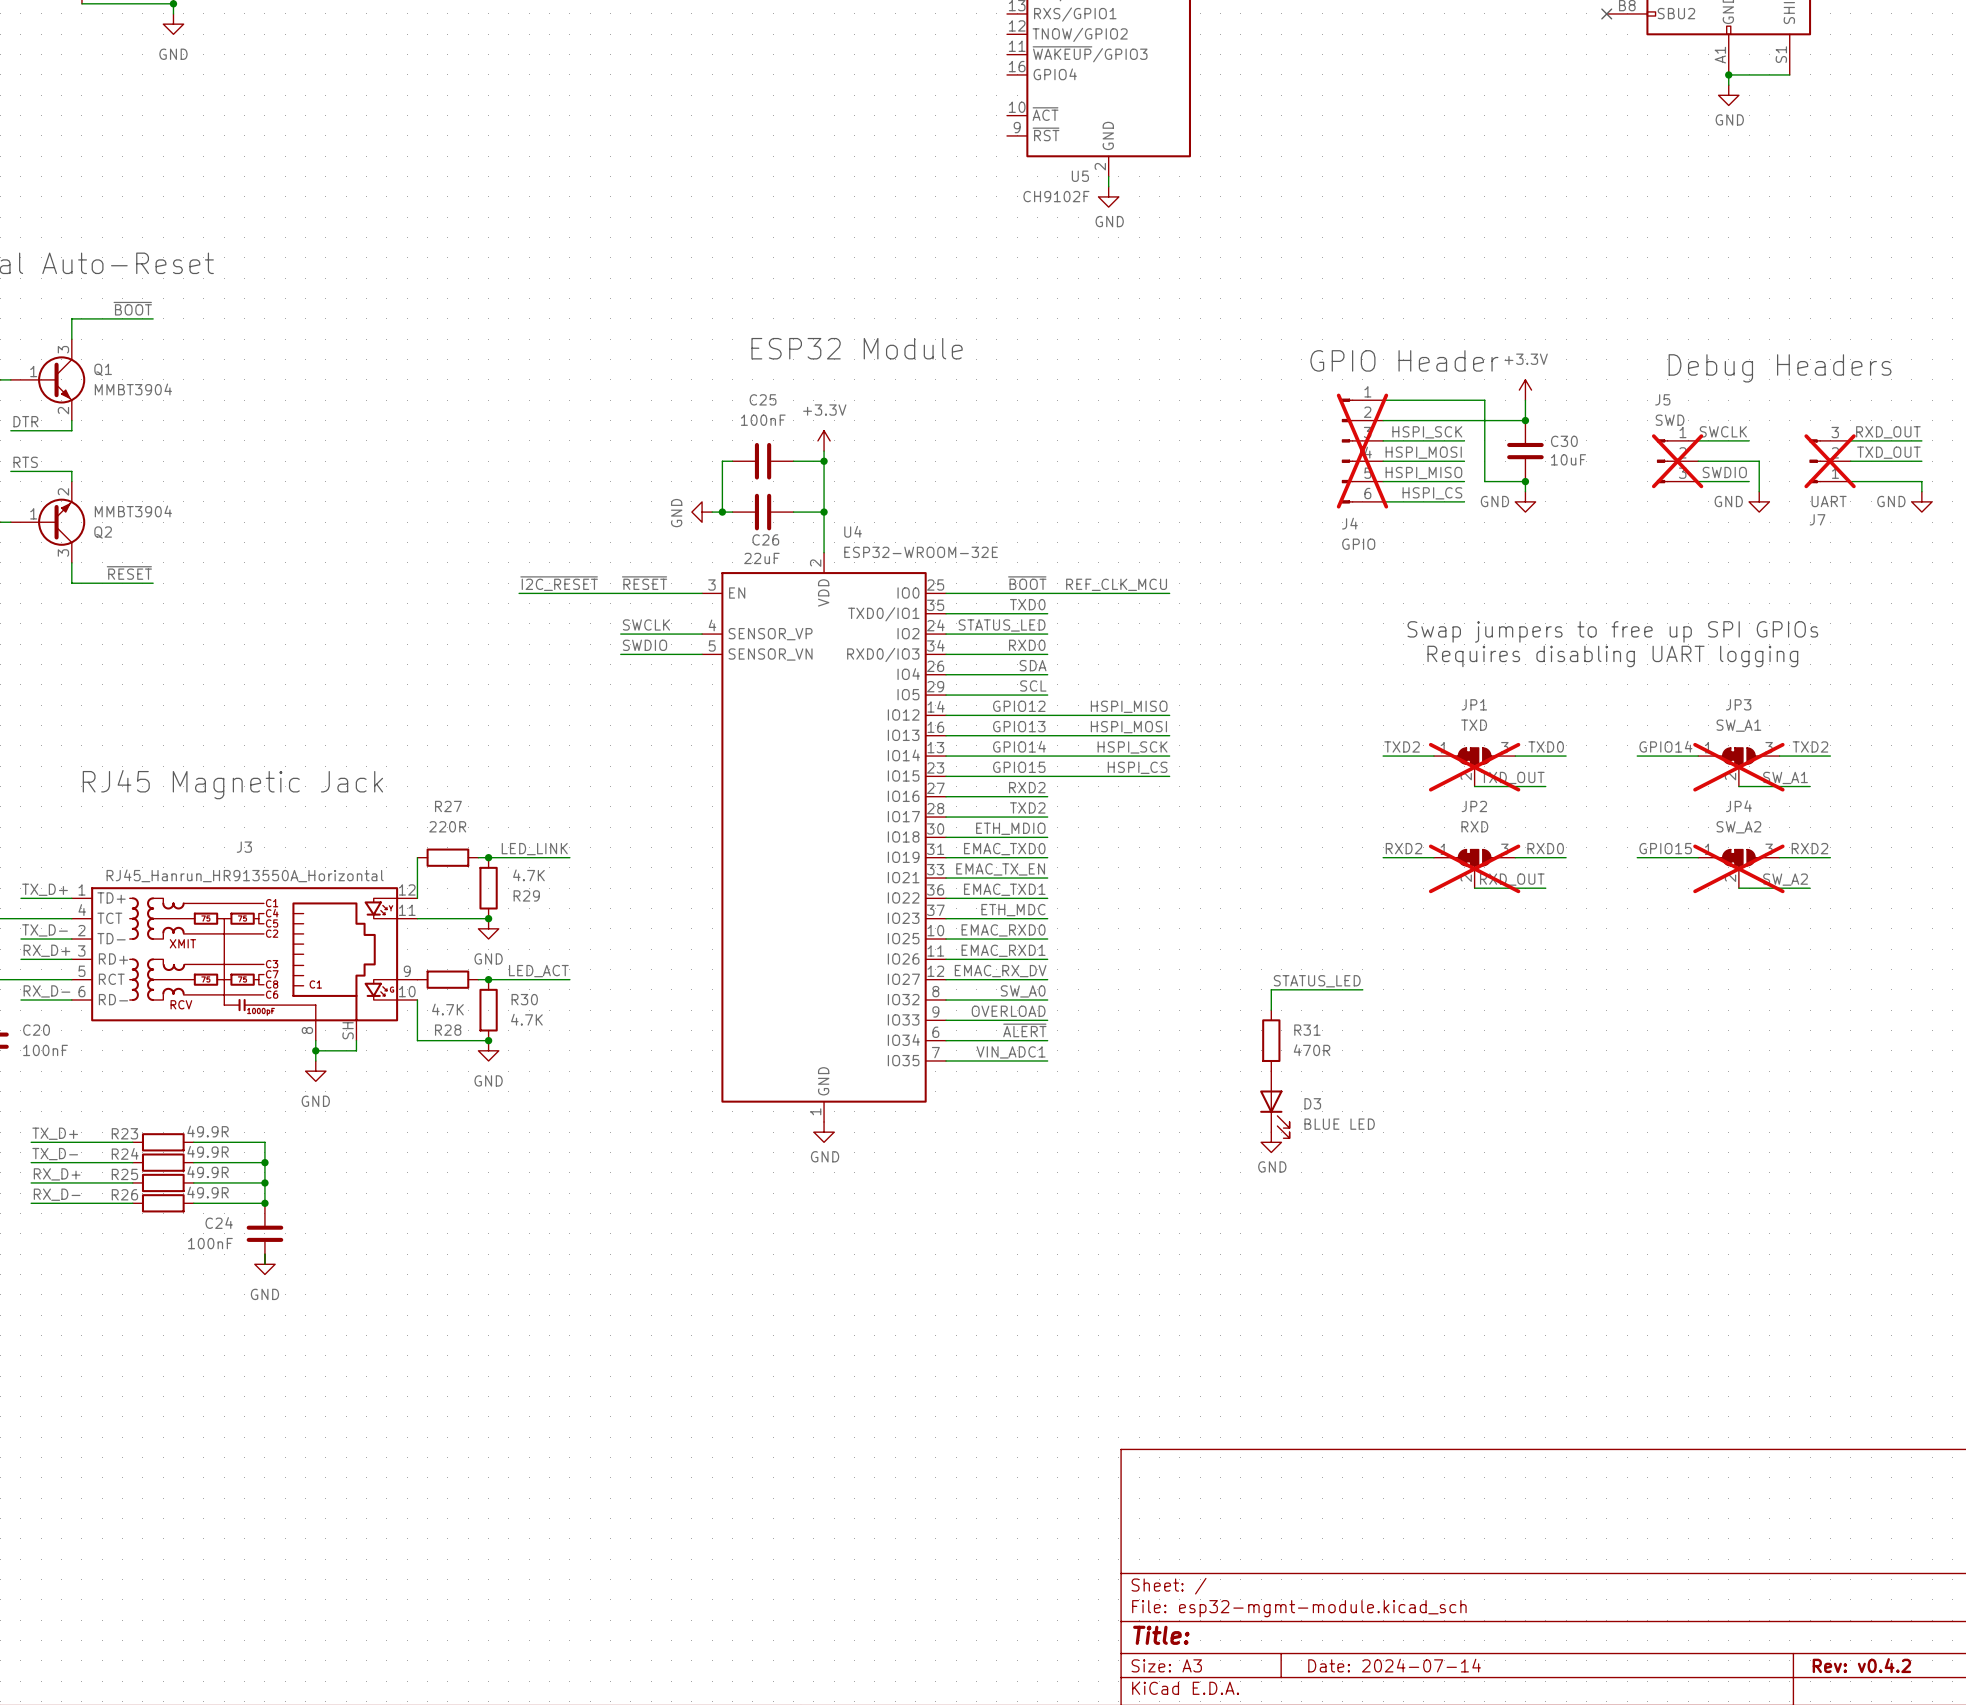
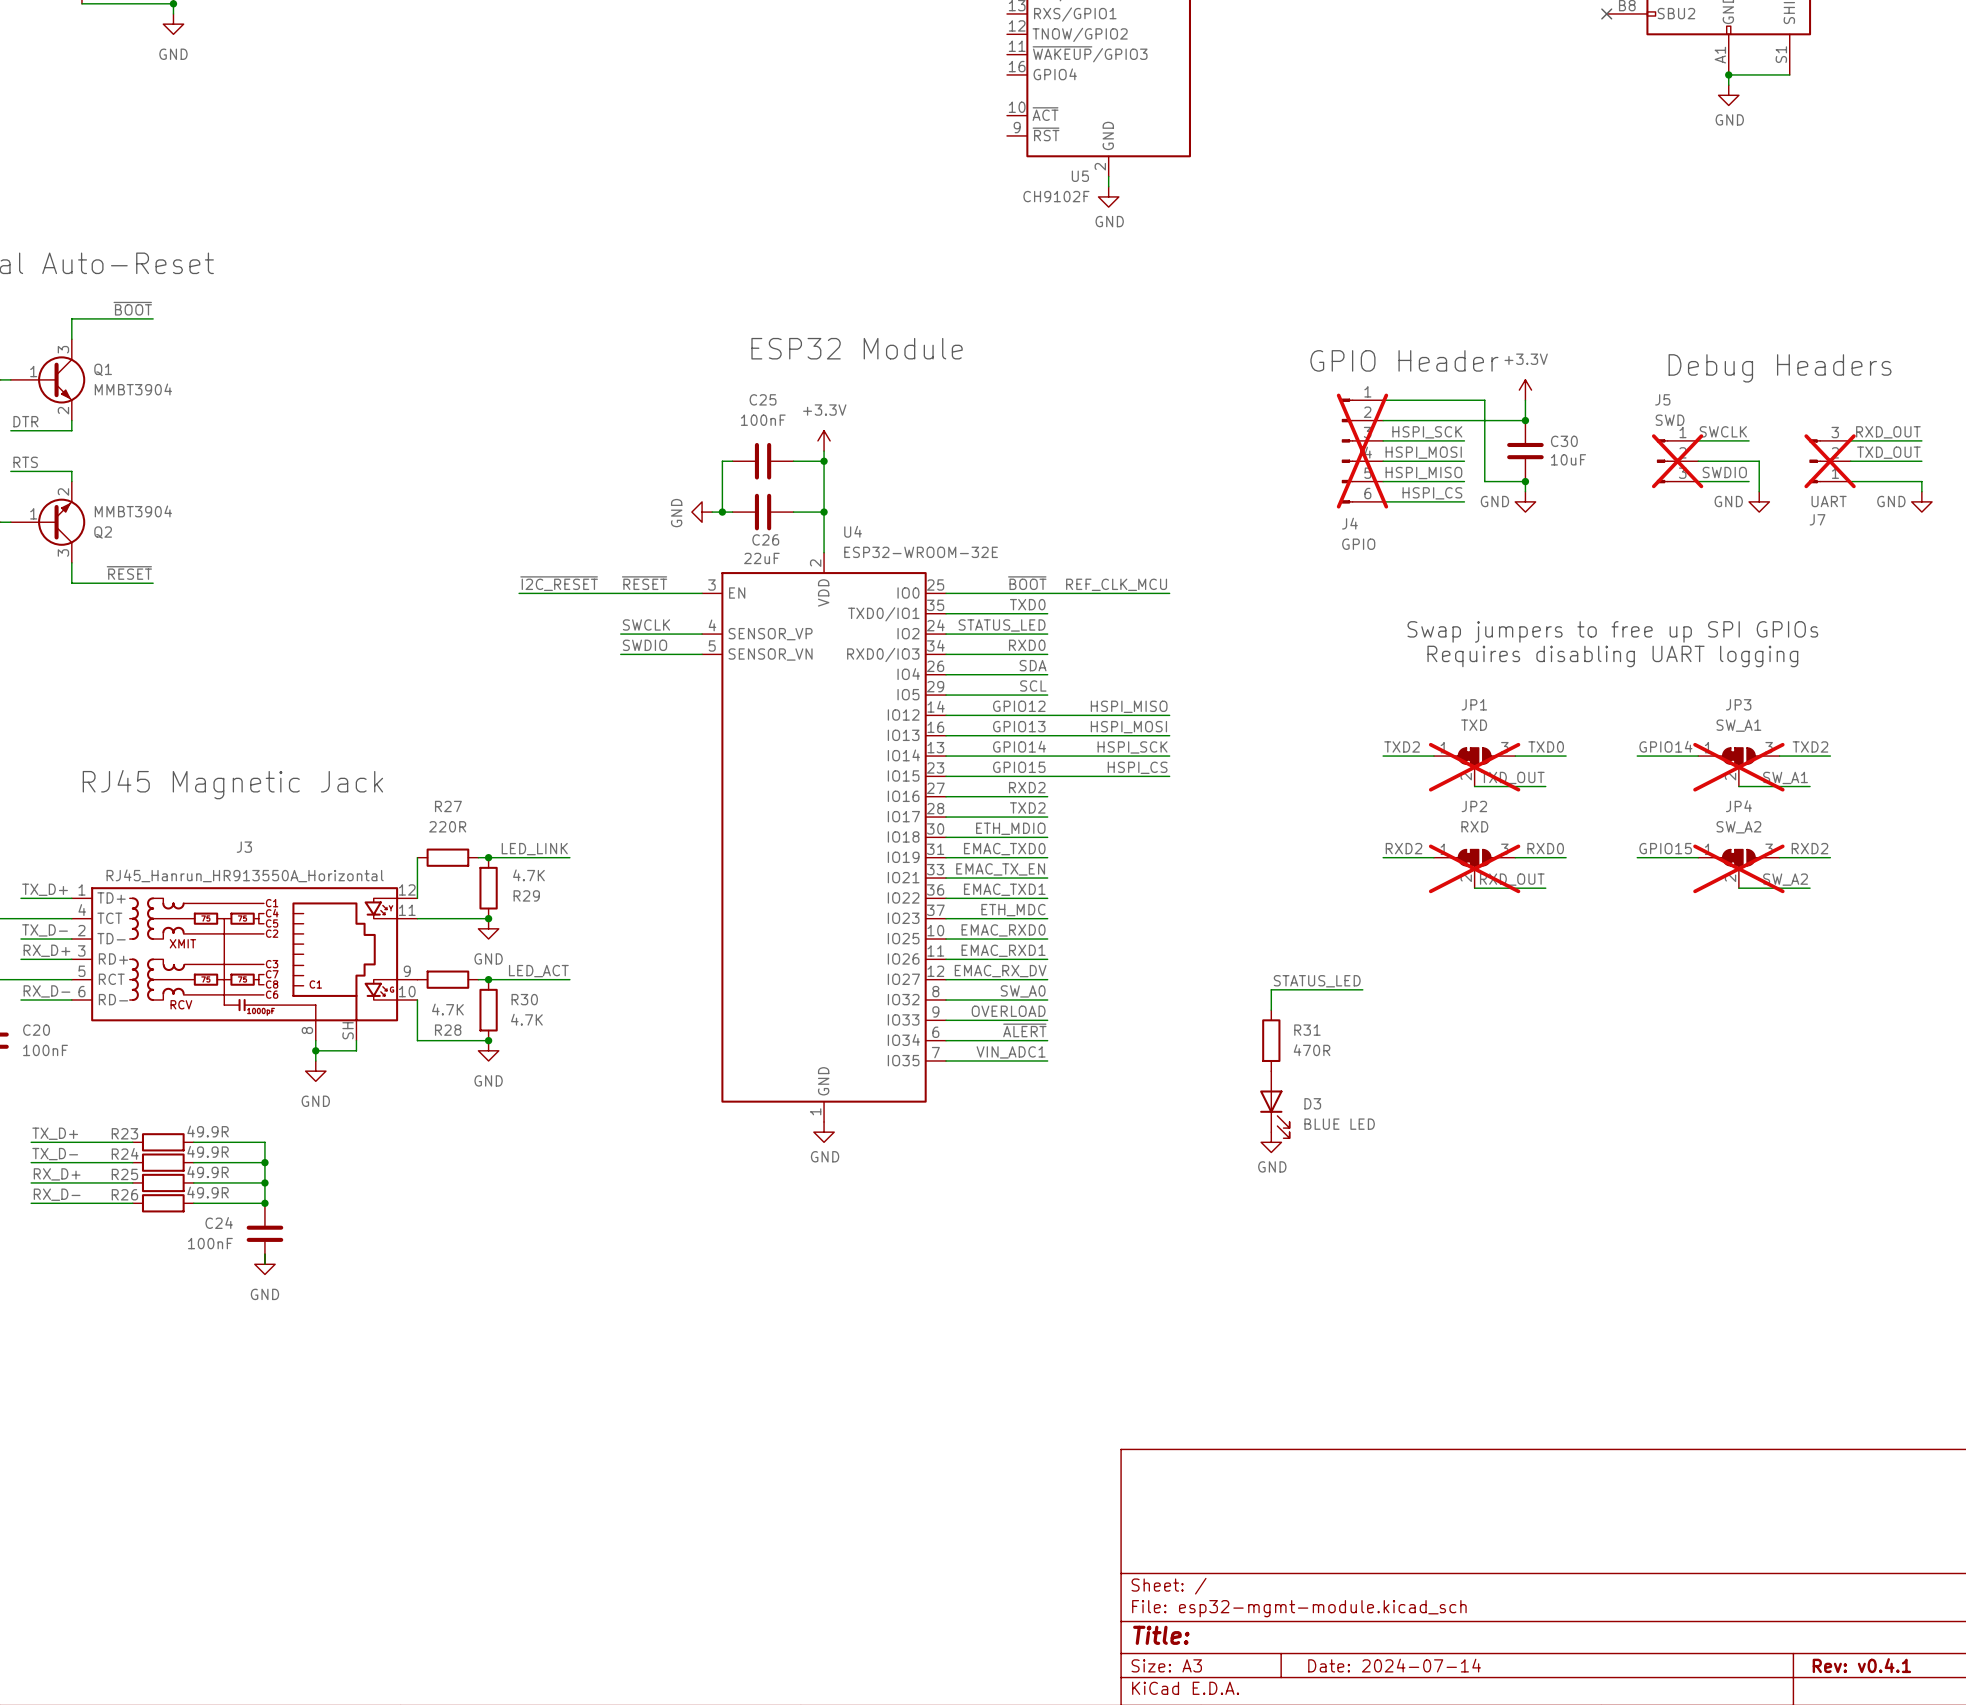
title block: Rev: v0.4.2 (1861, 1665) -> Rev: v0.4.1 (1861, 1665)

